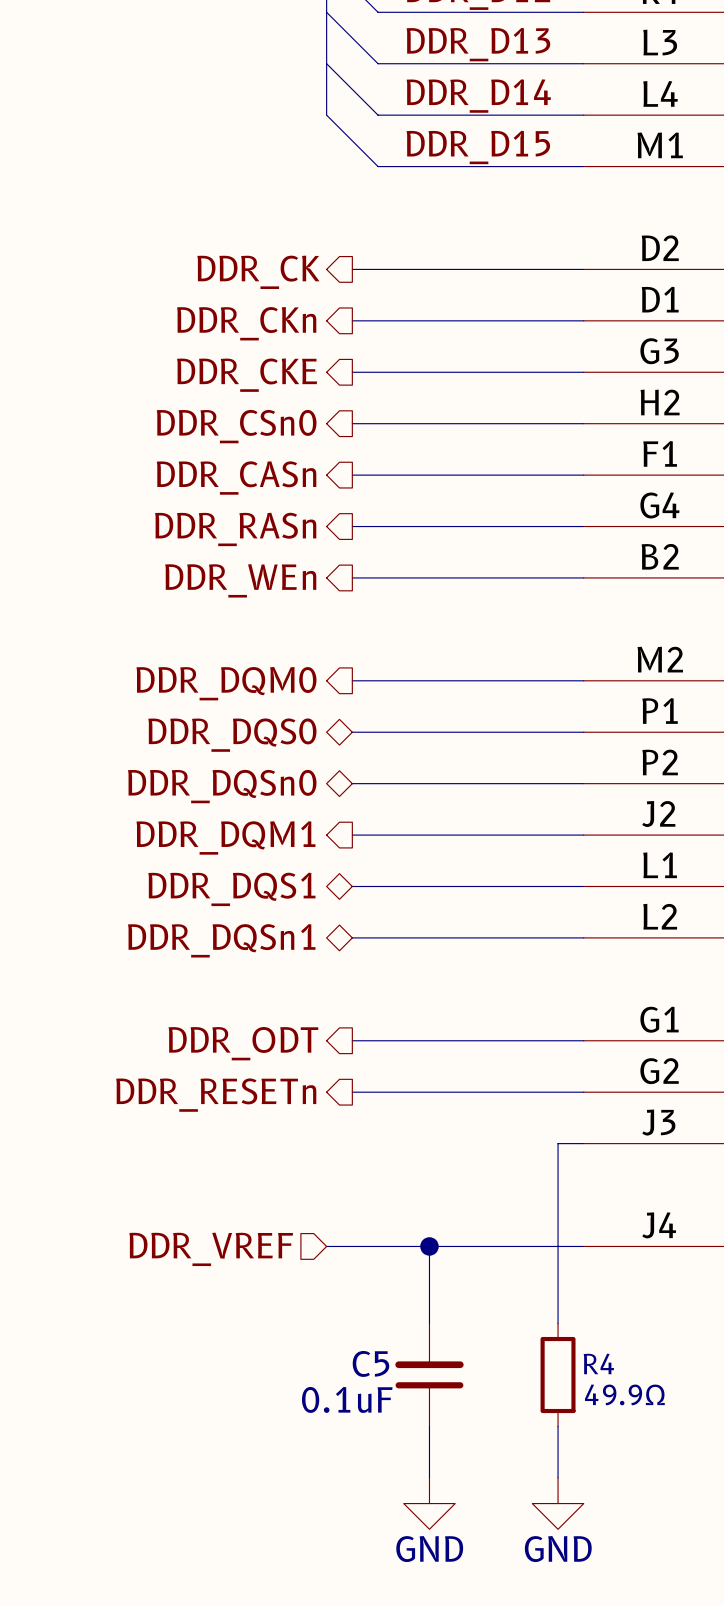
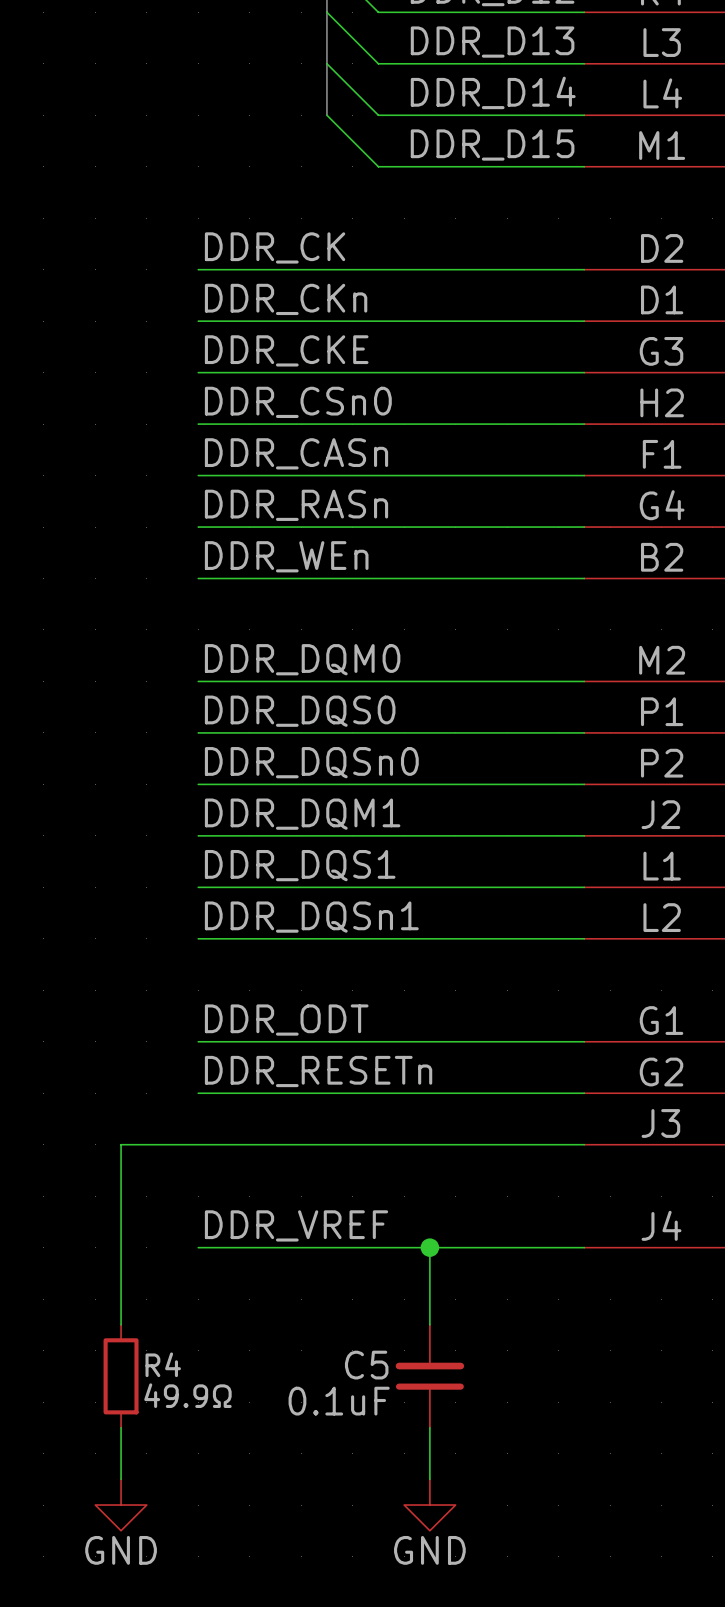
label: none -> DDR_CK (275, 247)
wire: none -> (198, 269) (352, 269)
hierarchical label: DDR_CK (258, 272) -> none
label: none -> DDR_CKn (286, 299)
wire: none -> (198, 321) (352, 321)
hierarchical label: DDR_CKn (246, 323) -> none
label: none -> DDR_CKE (286, 350)
wire: none -> (198, 372) (352, 372)
hierarchical label: DDR_CKE (247, 375) -> none
label: none -> DDR_CSn0 (298, 402)
wire: none -> (198, 424) (352, 424)
hierarchical label: DDR_CSn0 (236, 426) -> none
label: none -> DDR_CASn (296, 453)
wire: none -> (198, 475) (352, 475)
hierarchical label: DDR_CASn (236, 478) -> none
label: none -> DDR_RASn (296, 505)
wire: none -> (198, 527) (352, 527)
hierarchical label: DDR_RASn (235, 529) -> none
label: none -> DDR_WEn (286, 556)
wire: none -> (198, 578) (352, 578)
hierarchical label: DDR_WEn (240, 580) -> none
label: none -> DDR_DQM0 (302, 659)
wire: none -> (198, 681) (352, 681)
hierarchical label: DDR_DQM0 (226, 683) -> none
label: none -> DDR_DQS0 (300, 711)
wire: none -> (198, 732) (352, 732)
hierarchical label: DDR_DQS0 (232, 735) -> none
label: none -> DDR_DQSn0 (311, 762)
wire: none -> (198, 784) (352, 784)
hierarchical label: DDR_DQSn0 (222, 786) -> none
label: none -> DDR_DQM1 (302, 814)
wire: none -> (198, 835) (352, 835)
hierarchical label: DDR_DQM1 (225, 837) -> none
label: none -> DDR_DQS1 (300, 865)
wire: none -> (198, 887) (352, 887)
hierarchical label: DDR_DQS1 (231, 889) -> none
label: none -> DDR_DQSn1 (311, 917)
wire: none -> (198, 938) (352, 938)
hierarchical label: DDR_DQSn1 (221, 940) -> none
label: none -> DDR_ODT (286, 1020)
wire: none -> (198, 1041) (352, 1041)
hierarchical label: DDR_ODT (243, 1043) -> none
label: none -> DDR_RESETn (318, 1071)
wire: none -> (198, 1093) (352, 1093)
hierarchical label: DDR_RESETn (216, 1095) -> none
wire: (558, 1143) (558, 1323) -> (558, 1144) (121, 1144) (121, 1324)
label: none -> DDR_VREF (296, 1225)
wire: none -> (198, 1247) (326, 1247)
hierarchical label: DDR_VREF (211, 1249) -> none
R4 position: (558, 1375) -> (121, 1376)
wire: (558, 1426) (558, 1477) -> (121, 1427) (121, 1479)
power symbol position: GND (558, 1503) -> GND (121, 1505)

